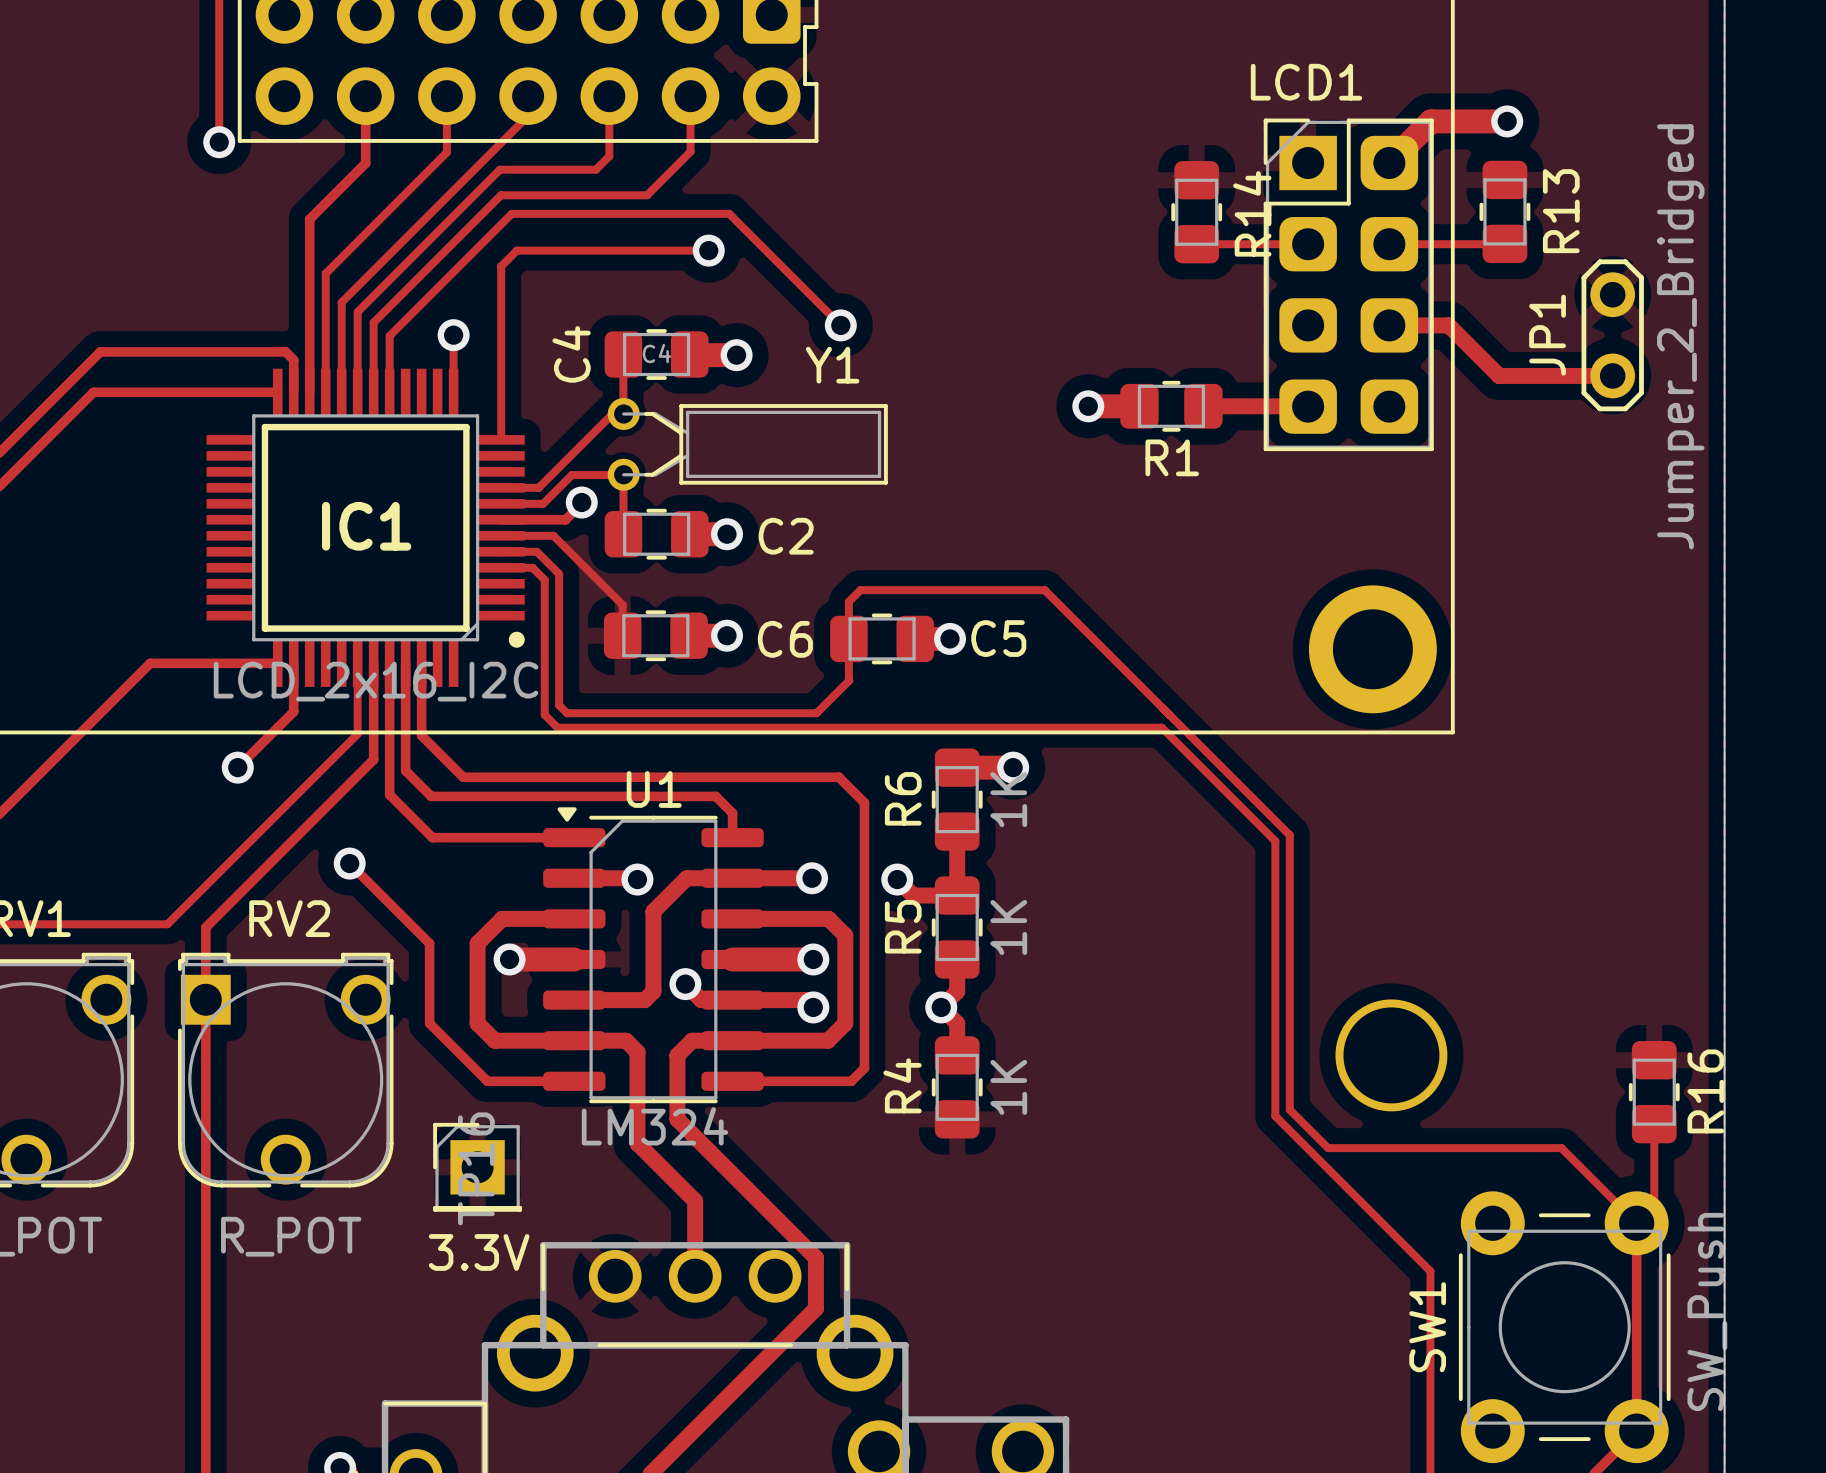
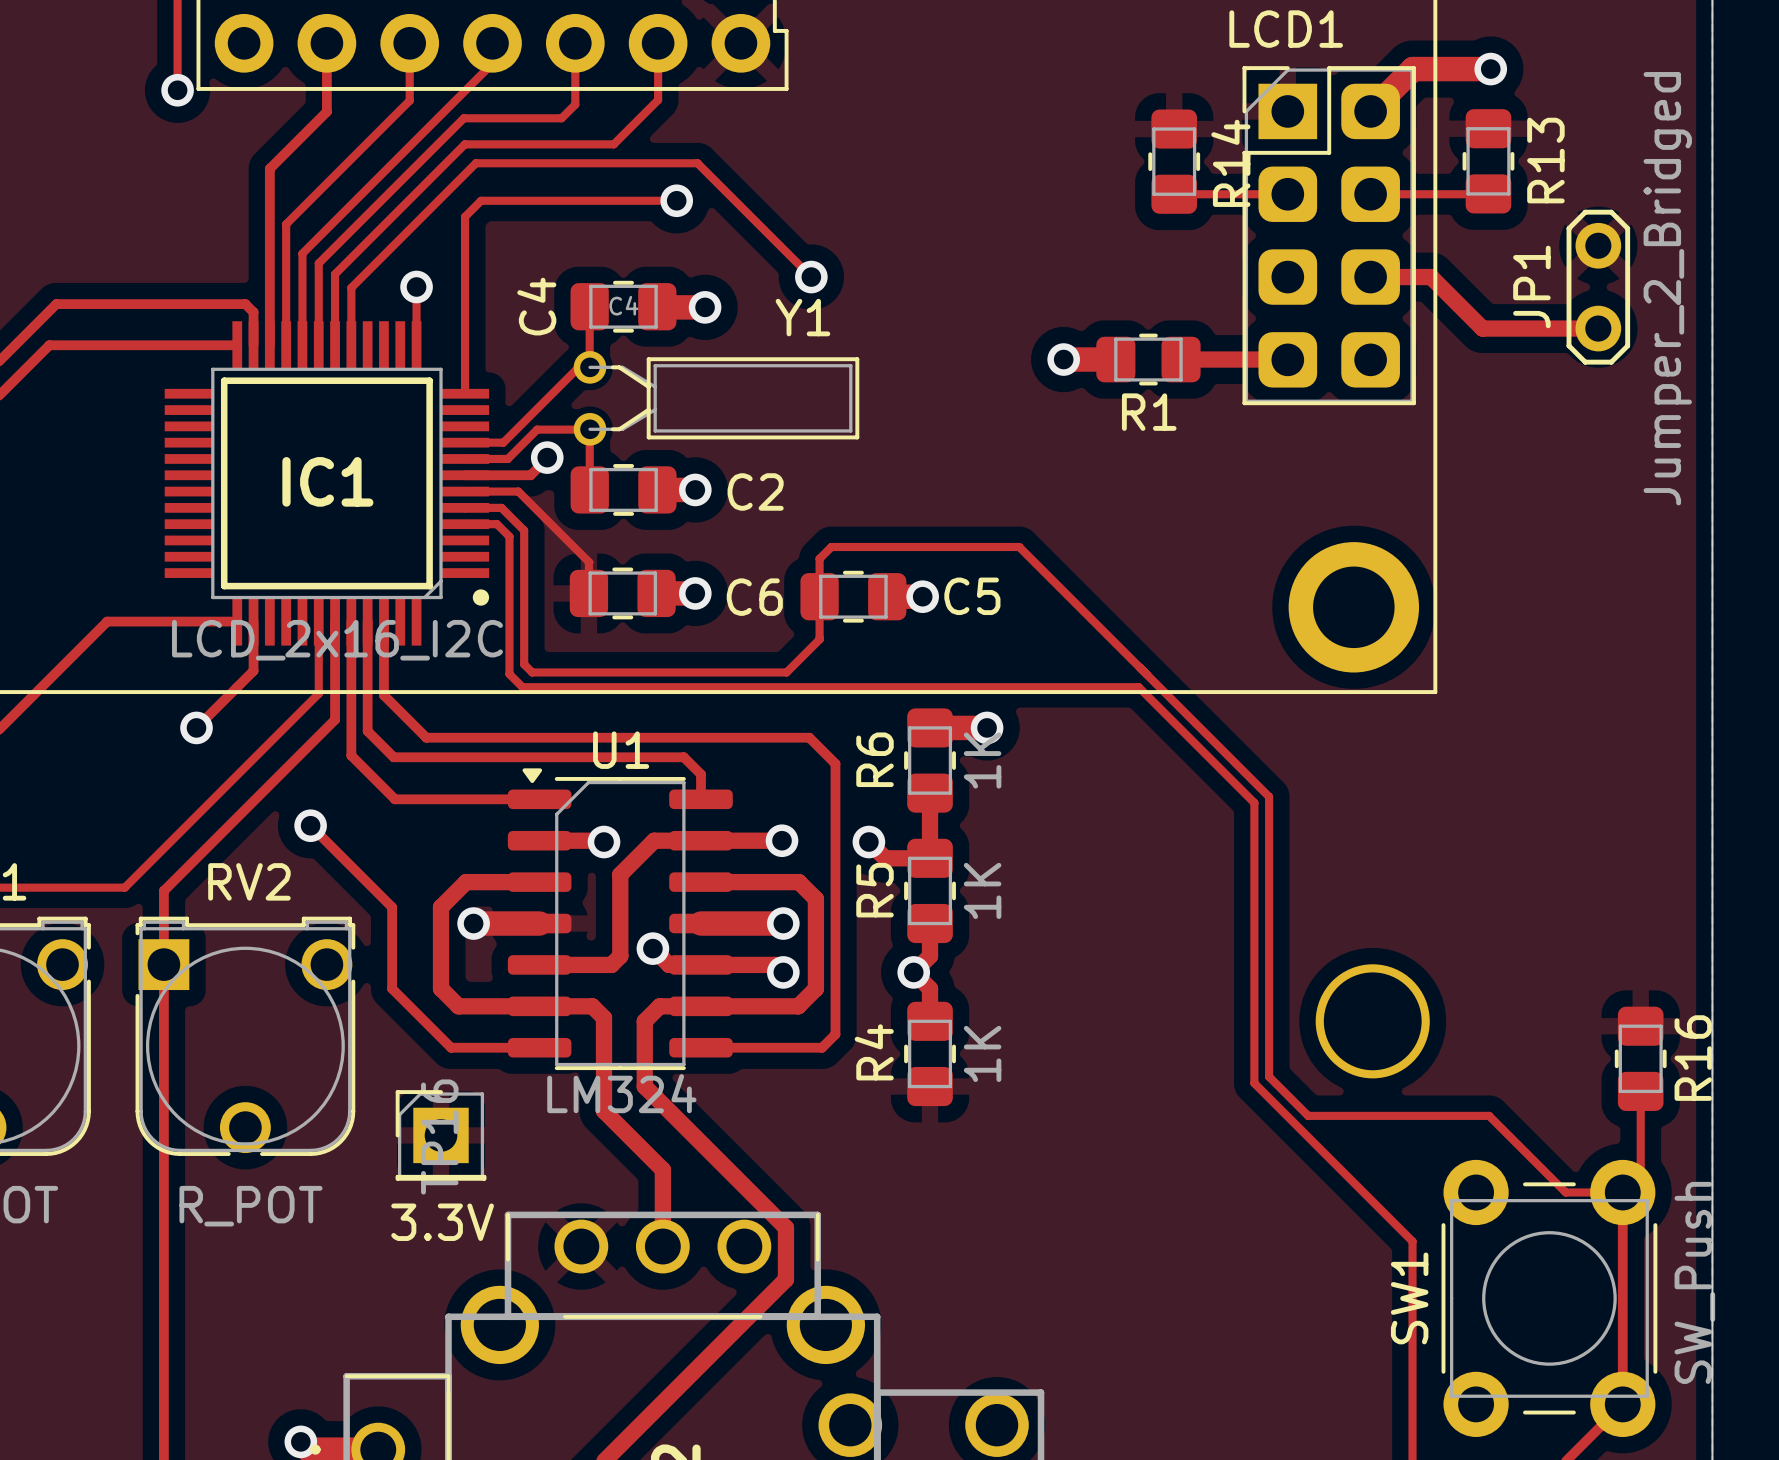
track: (1505, 1148) (1561, 1148) (1636, 1223) -> (1489, 1115) (1565, 1192) (1622, 1192)

